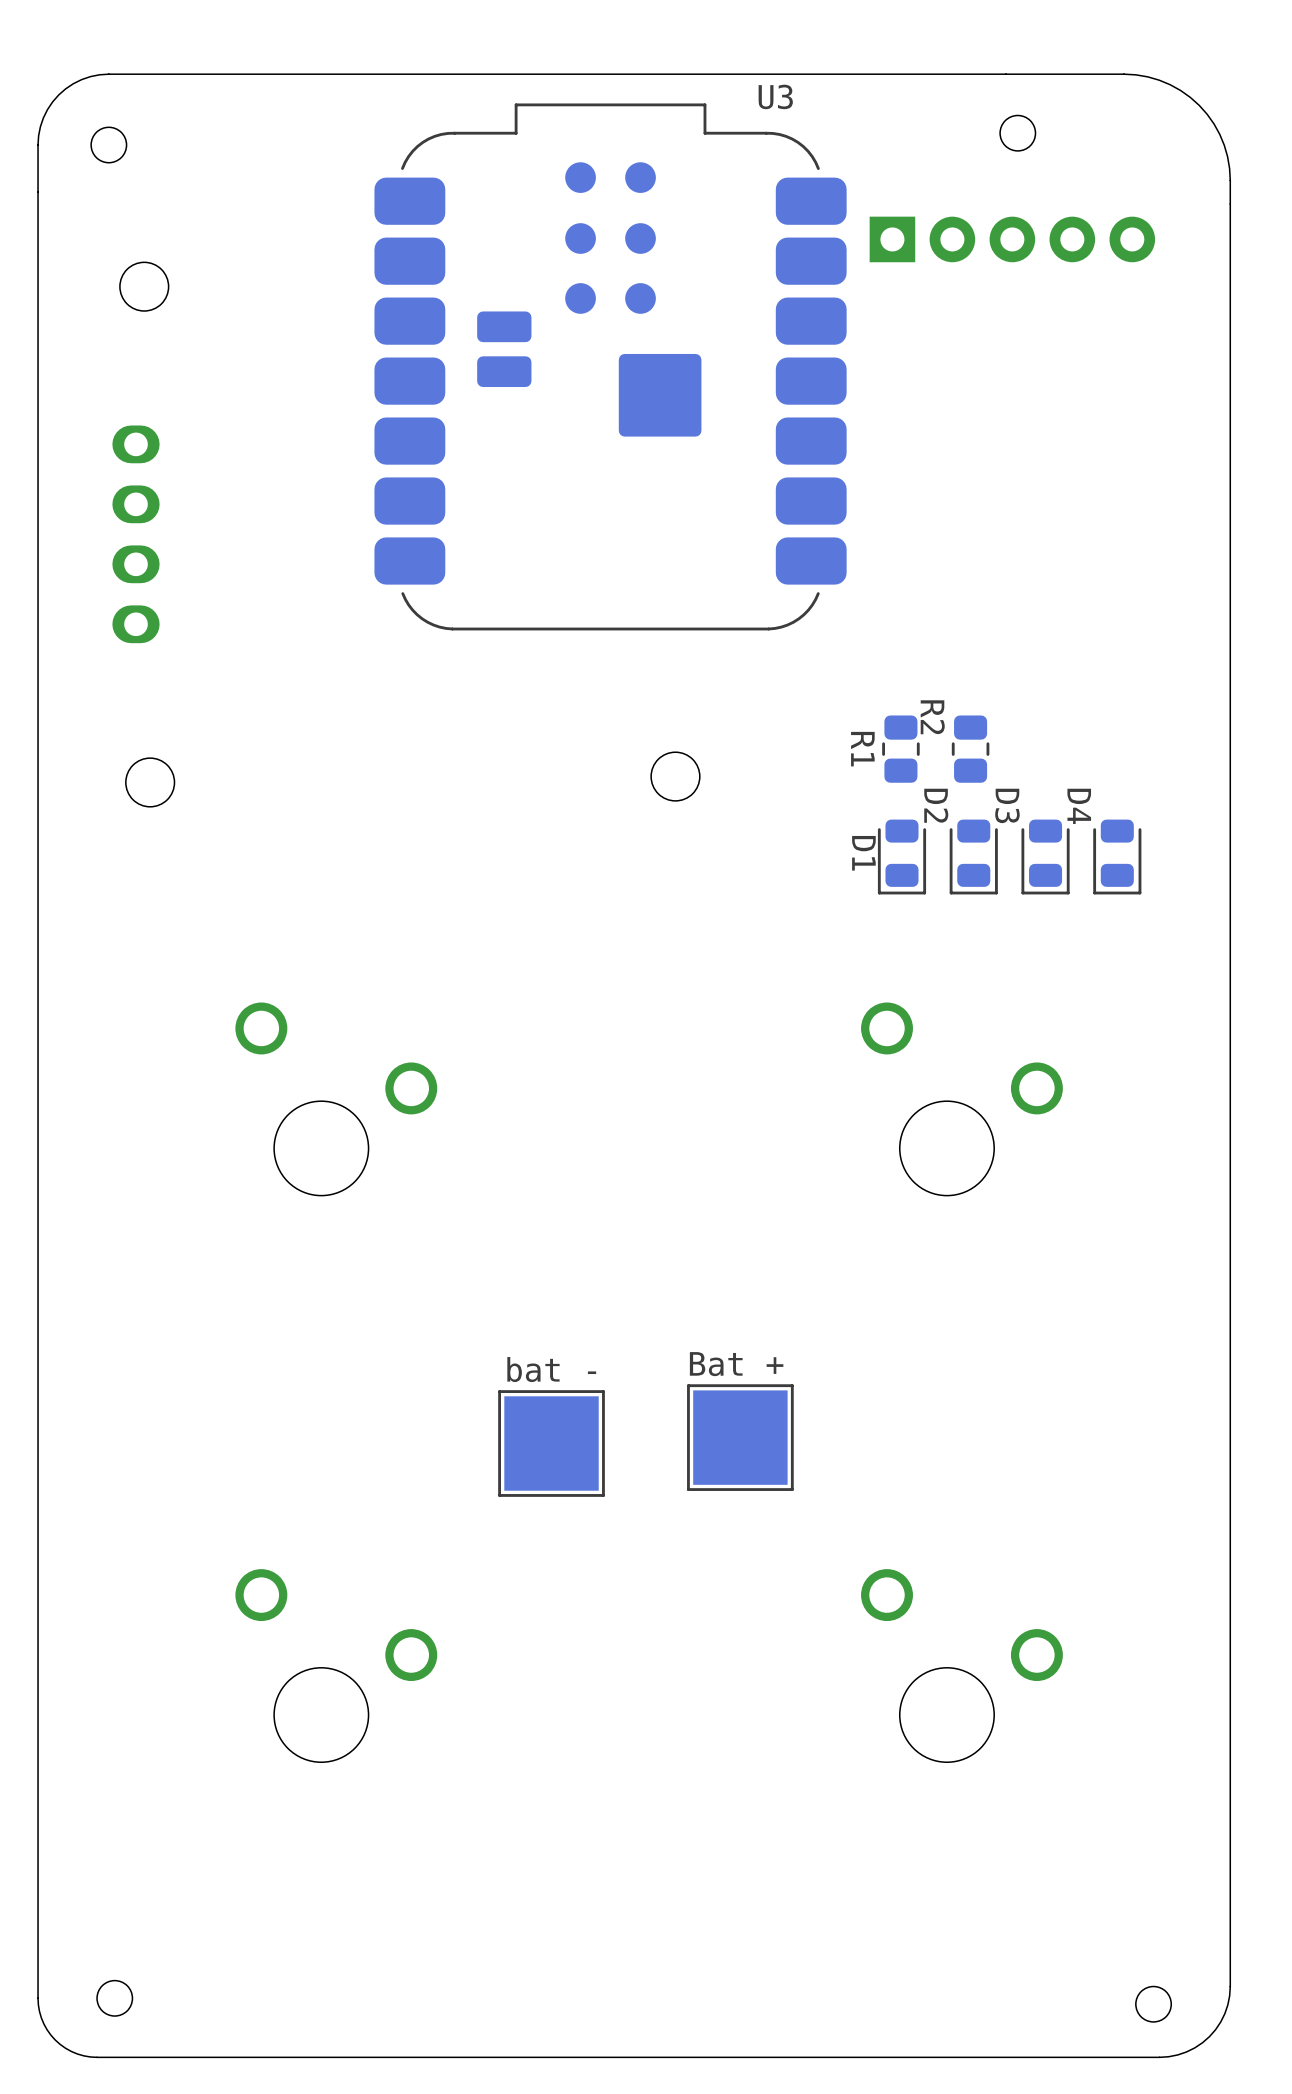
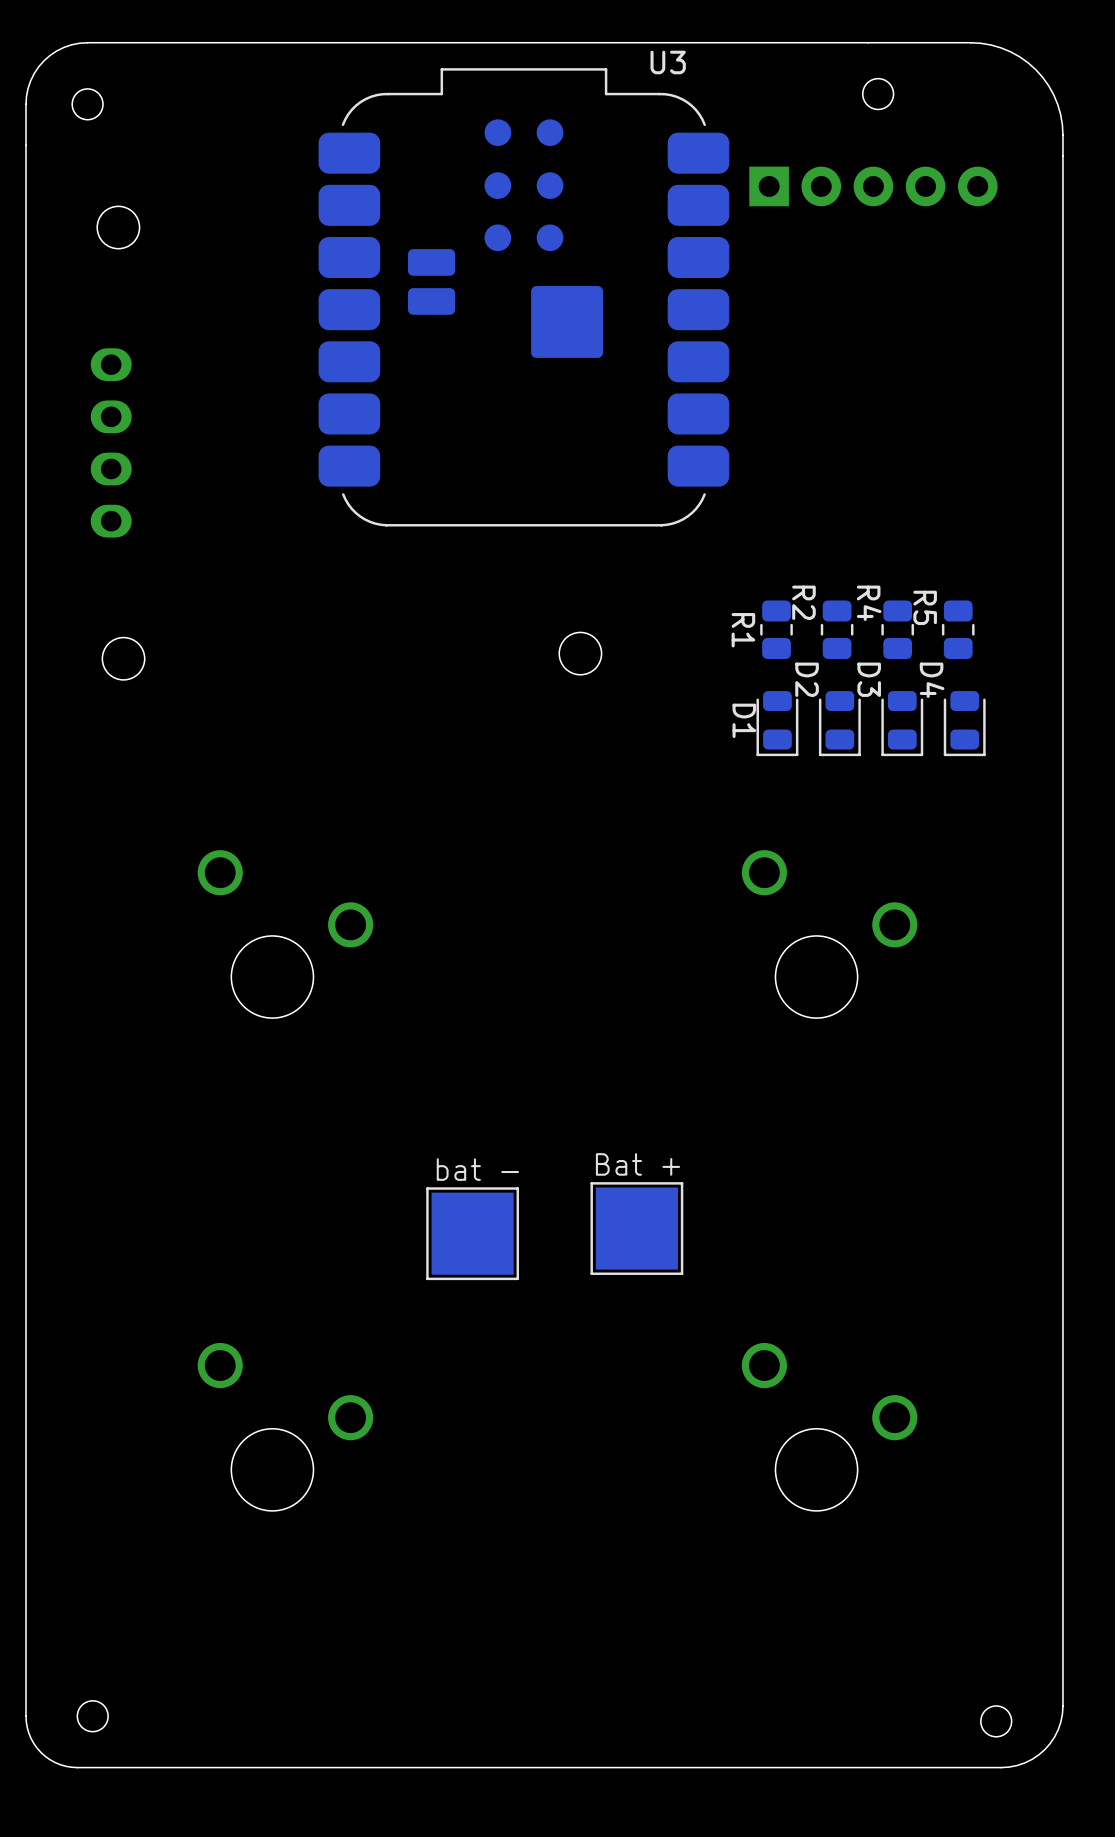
R4: none -> (897, 629)
R5: none -> (958, 629)

